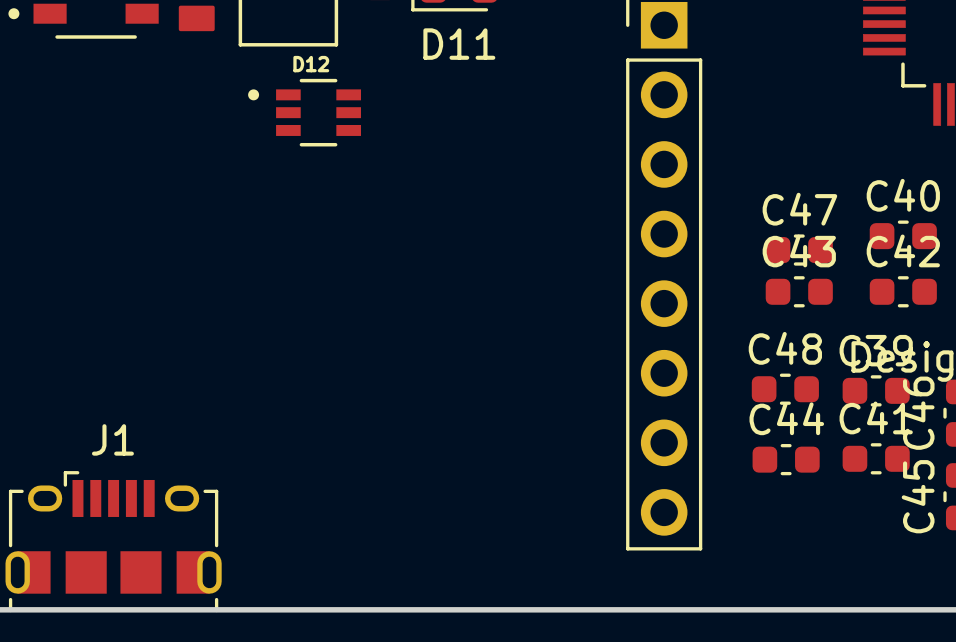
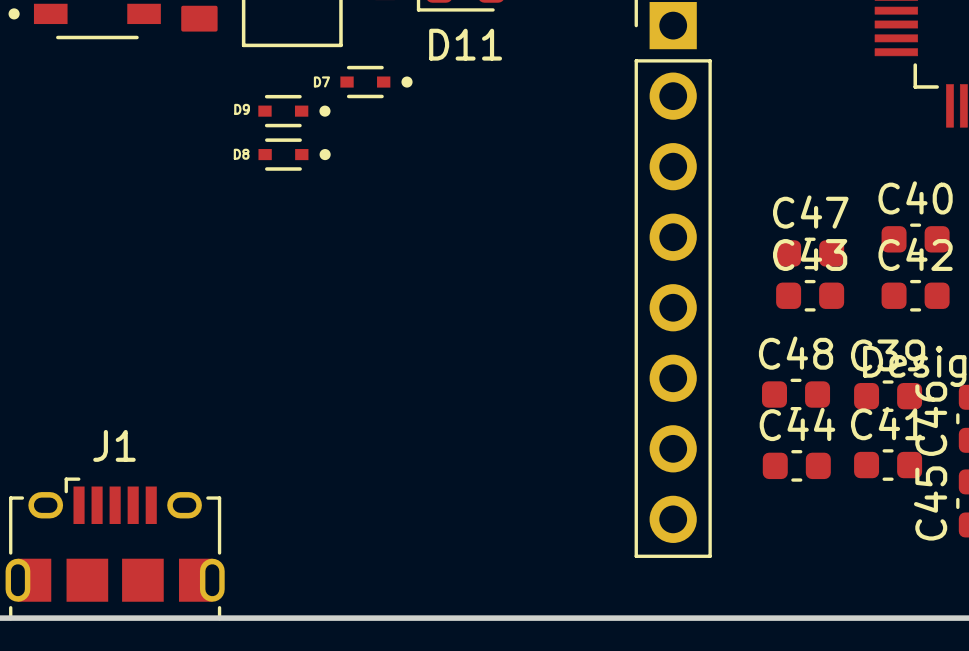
D7: none -> (376, 82)
D9: none -> (294, 111)
D12: (304, 112) -> none
D8: none -> (294, 154)

